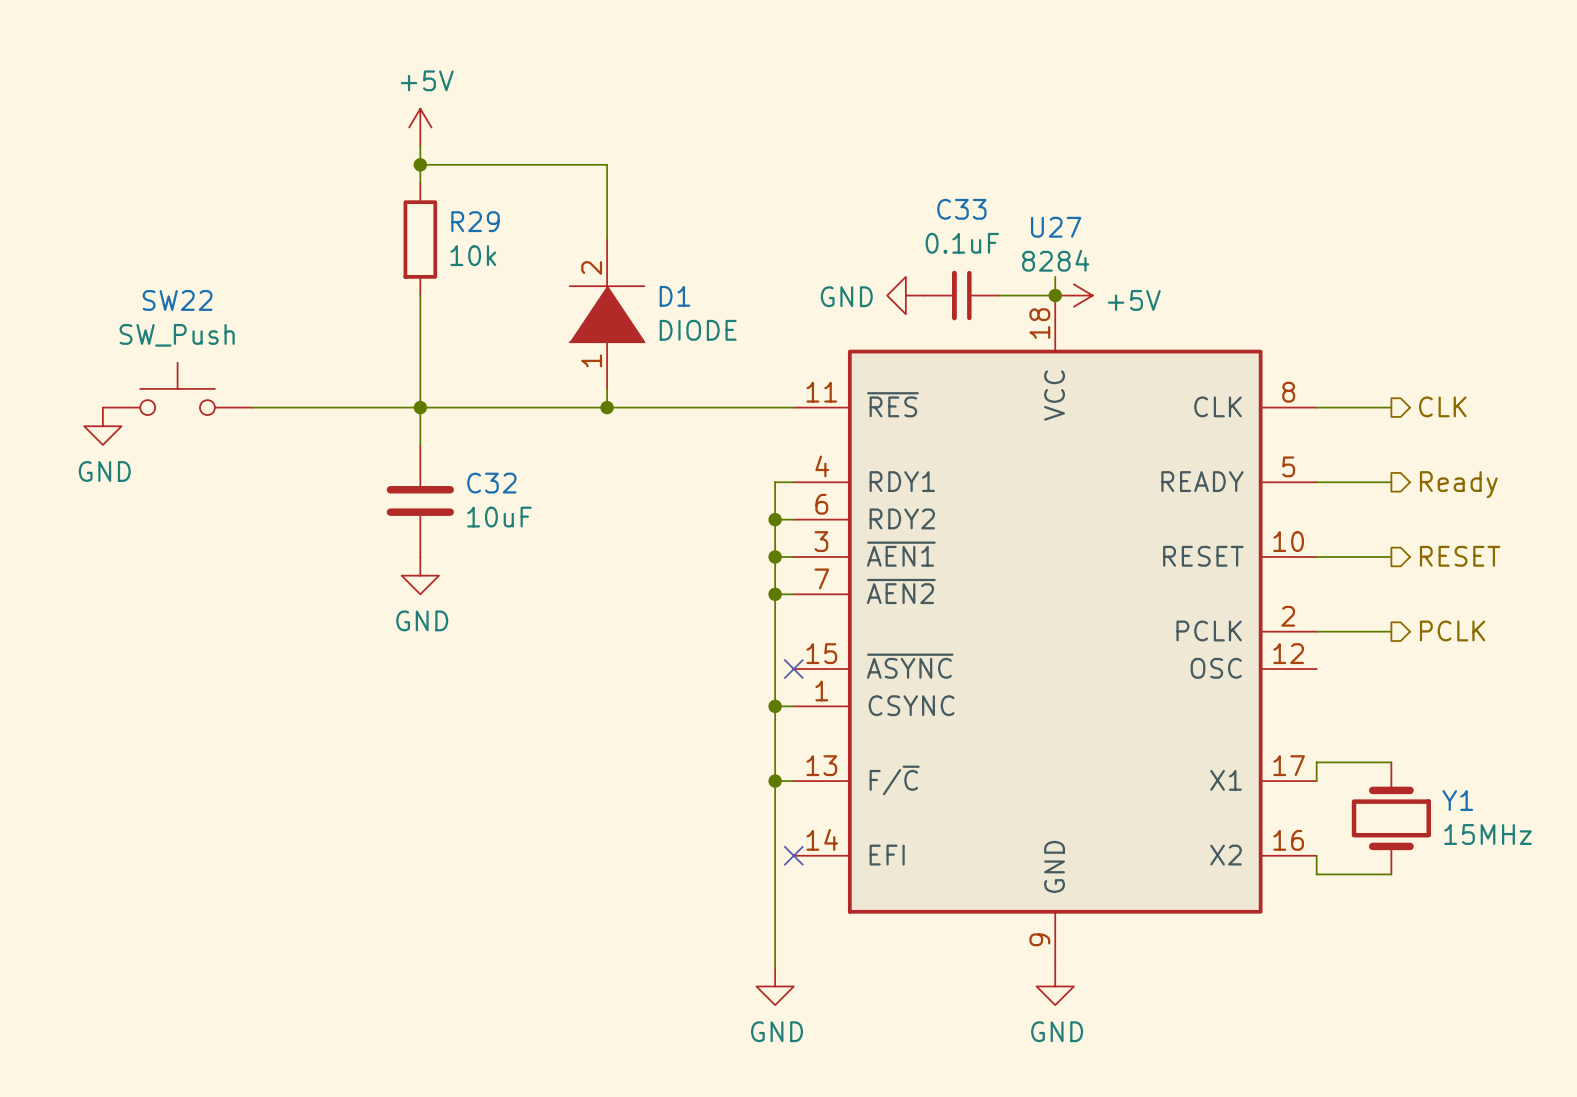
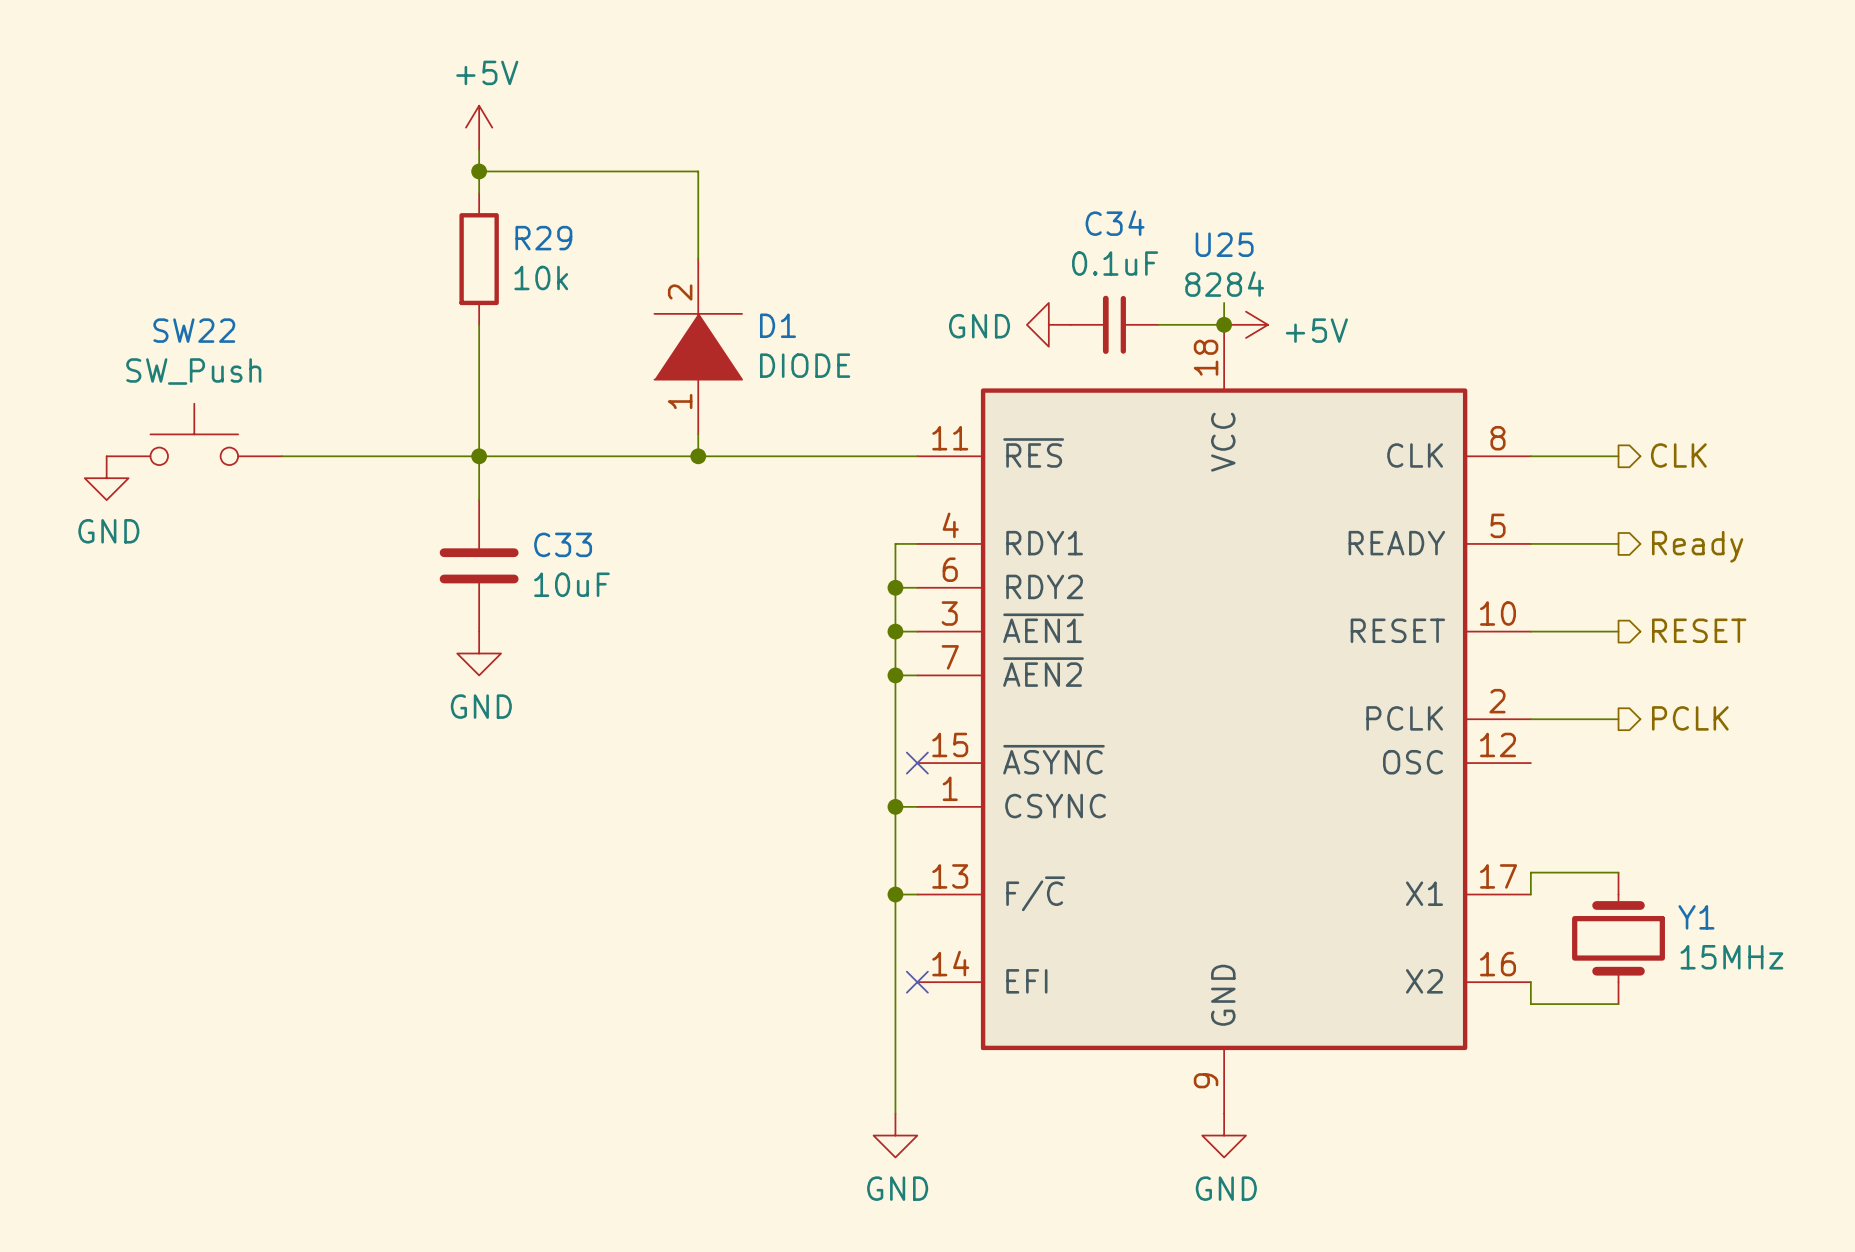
C33 name: C33 (961, 209) -> C34 (1115, 223)
U27 name: U27 (1056, 227) -> U25 (1224, 244)
C32 name: C32 (491, 483) -> C33 (563, 544)

